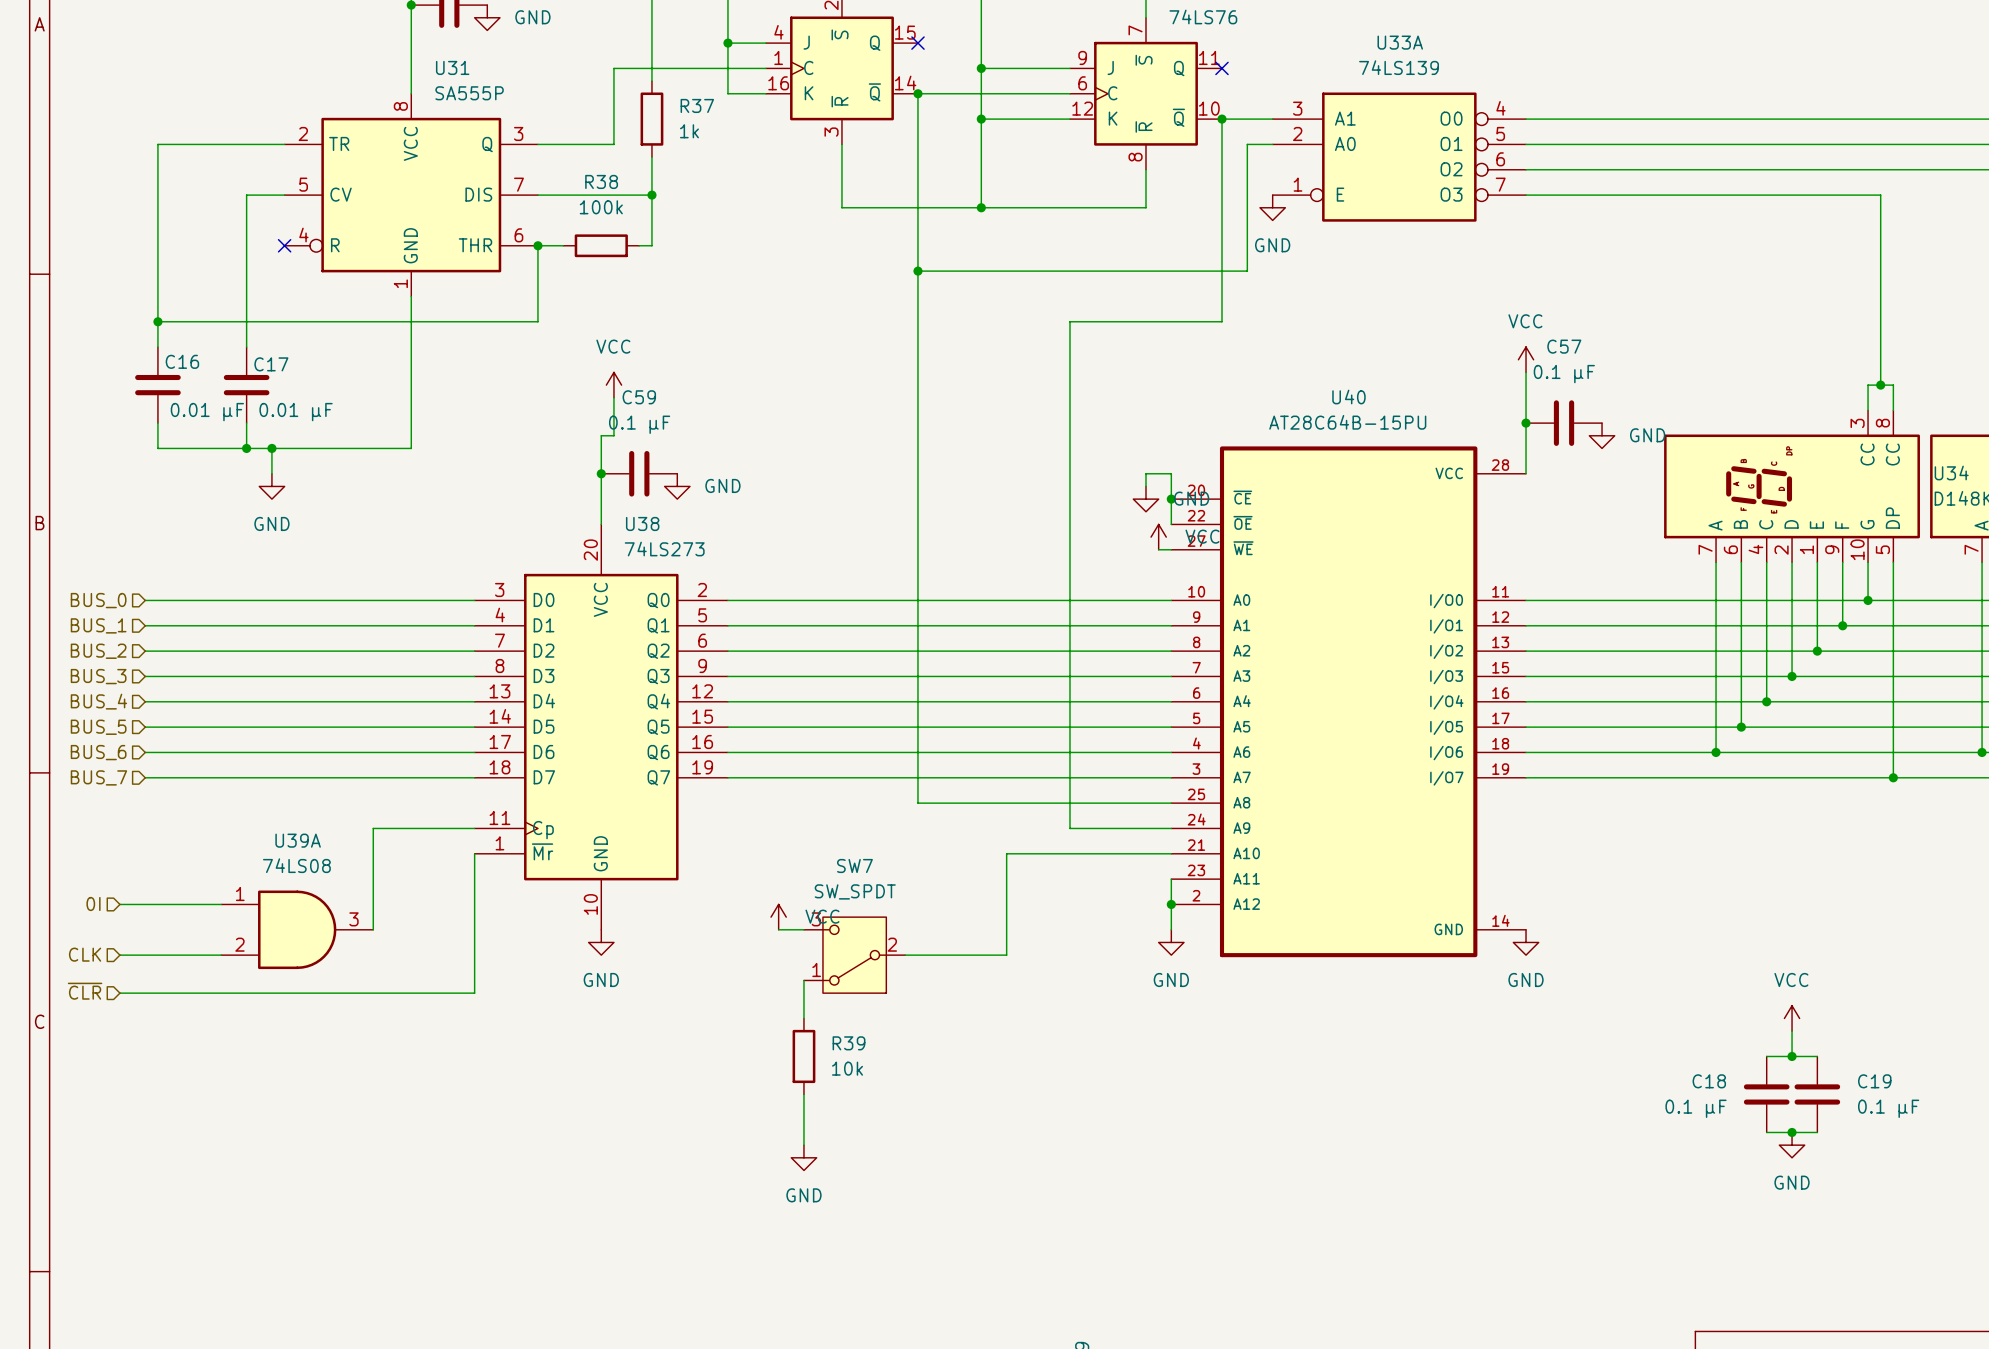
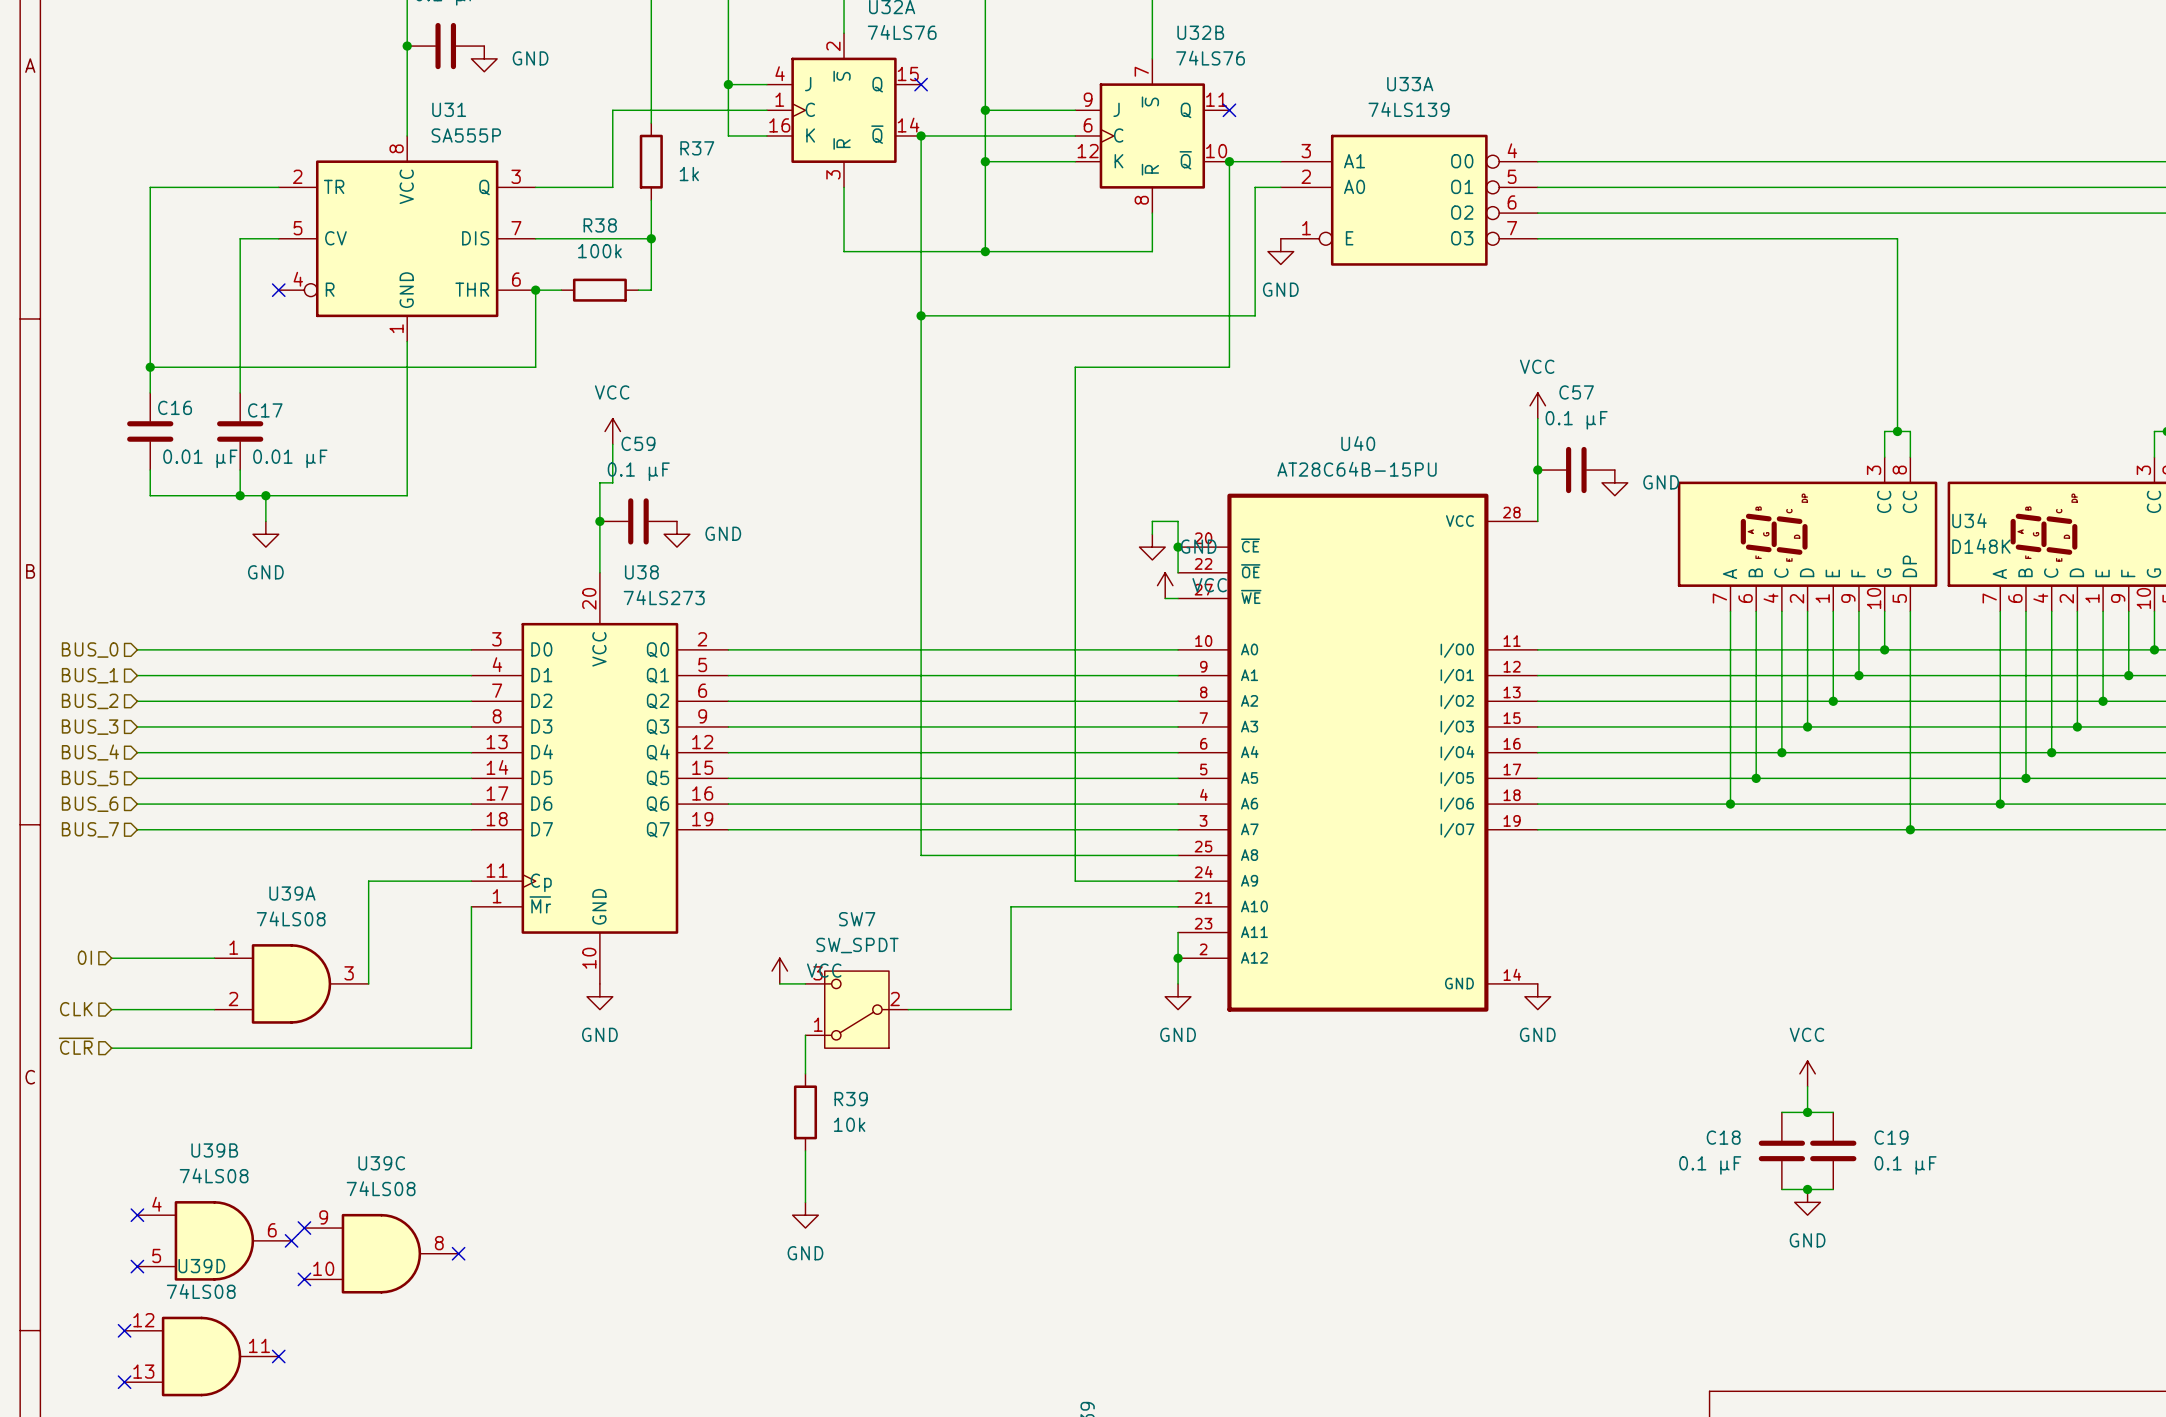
no-connect mark: none -> (137, 1215)
no-connect mark: none -> (304, 1228)
U39B: none -> 74LS08 (214, 1240)
no-connect mark: none -> (291, 1240)
U39C: none -> 74LS08 (381, 1253)
no-connect mark: none -> (458, 1253)
no-connect mark: none -> (137, 1266)
no-connect mark: none -> (304, 1279)
no-connect mark: none -> (124, 1330)
U39D: none -> 74LS08 (201, 1356)
no-connect mark: none -> (278, 1356)
no-connect mark: none -> (124, 1382)

